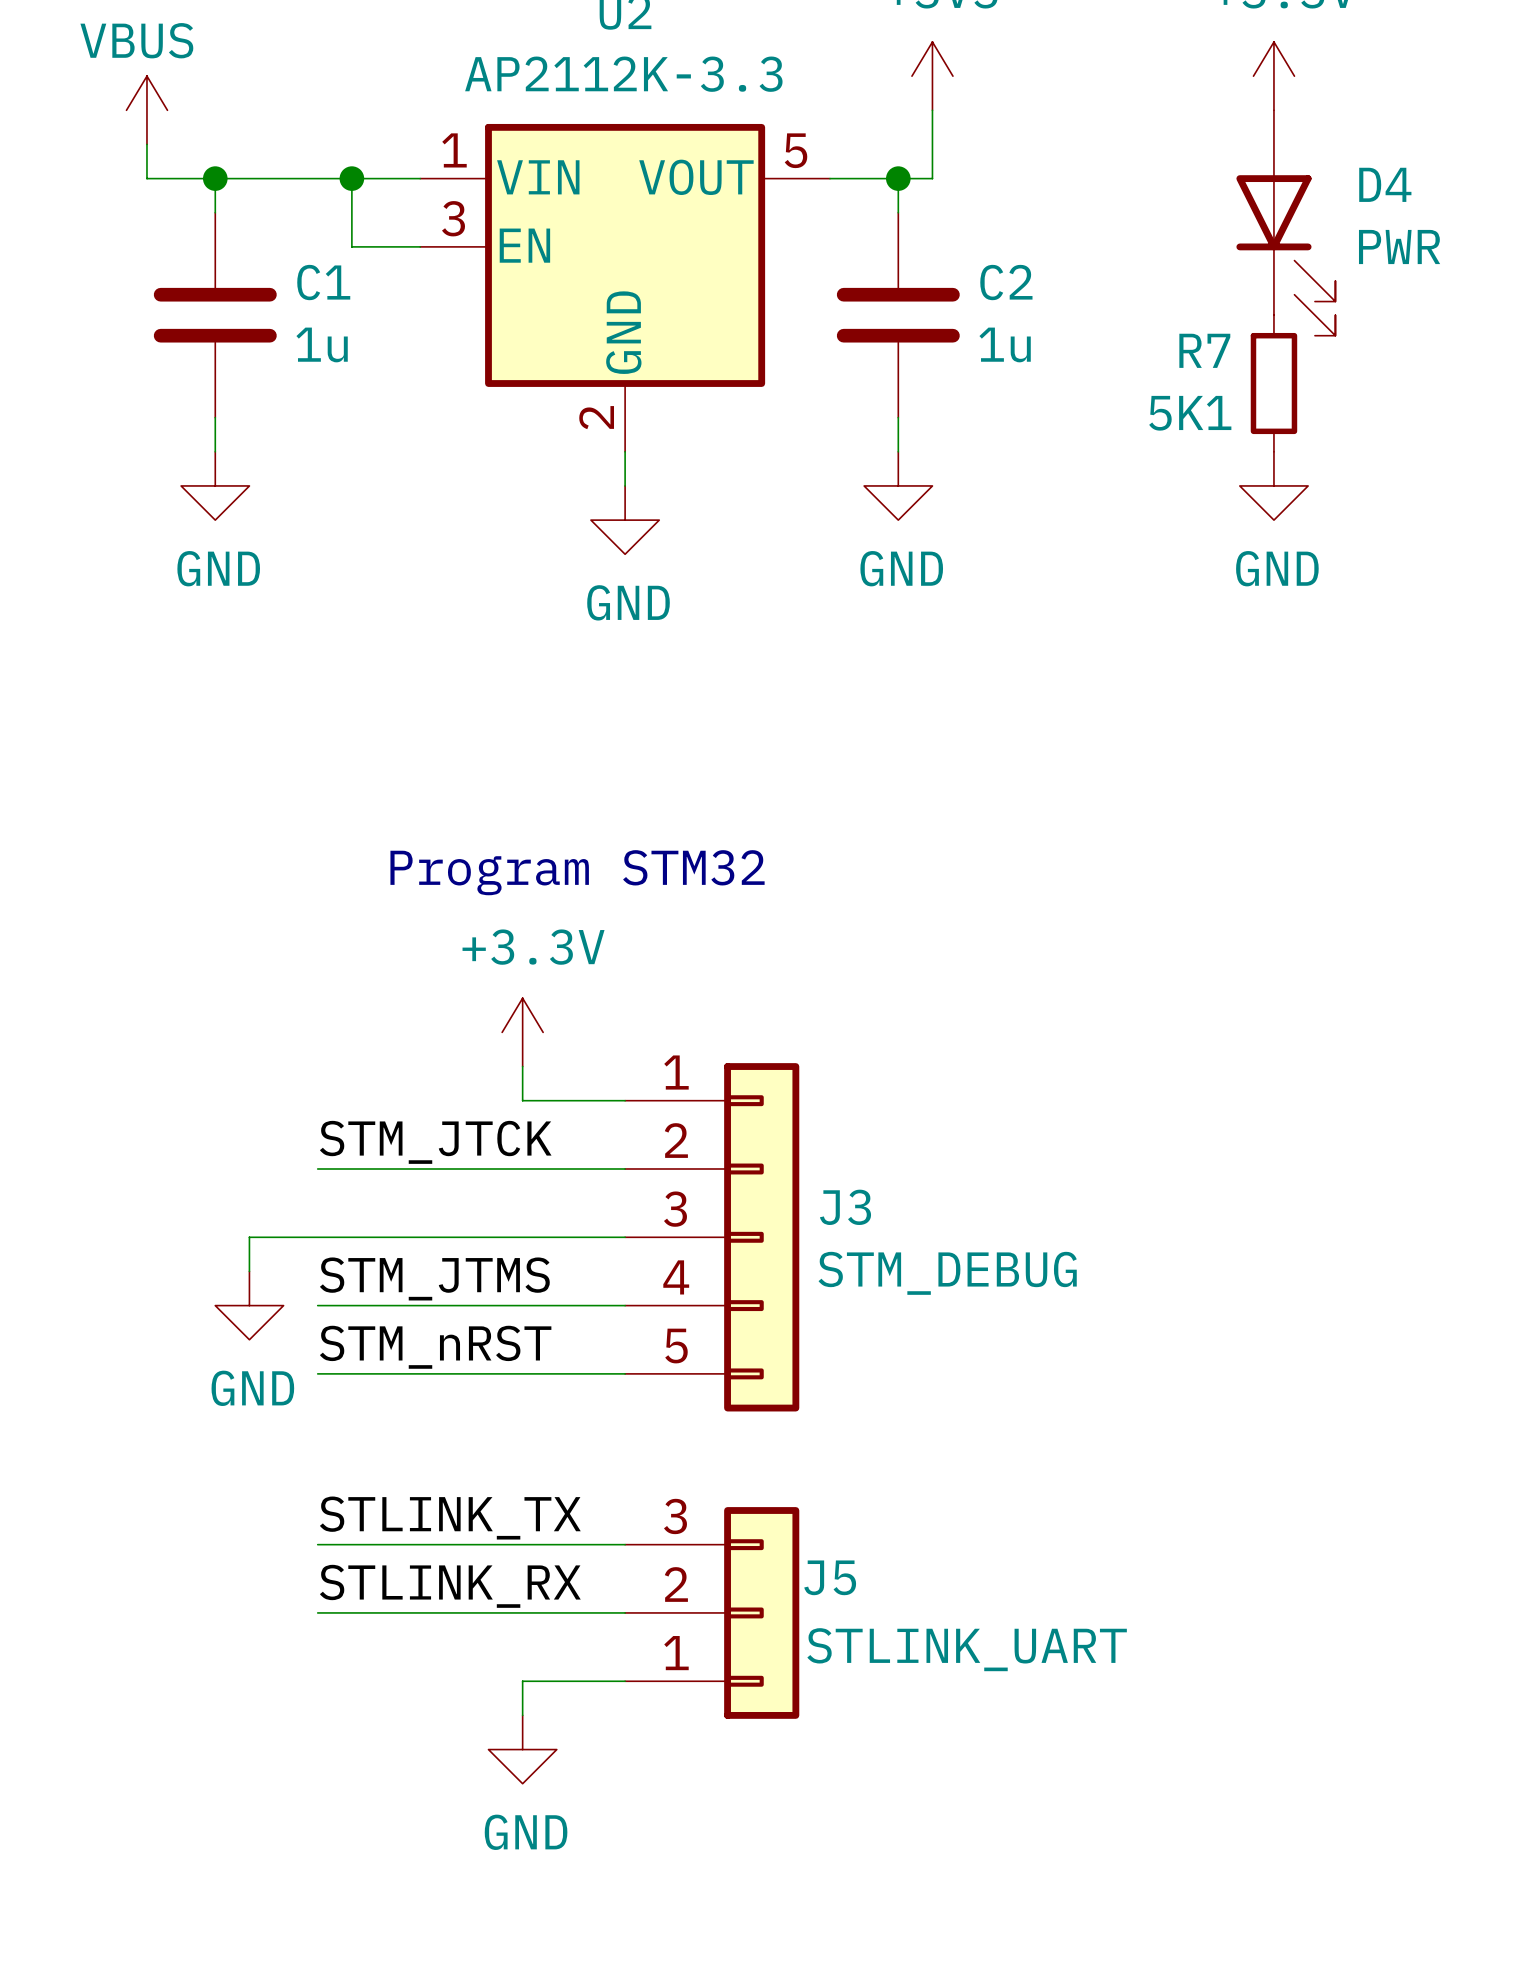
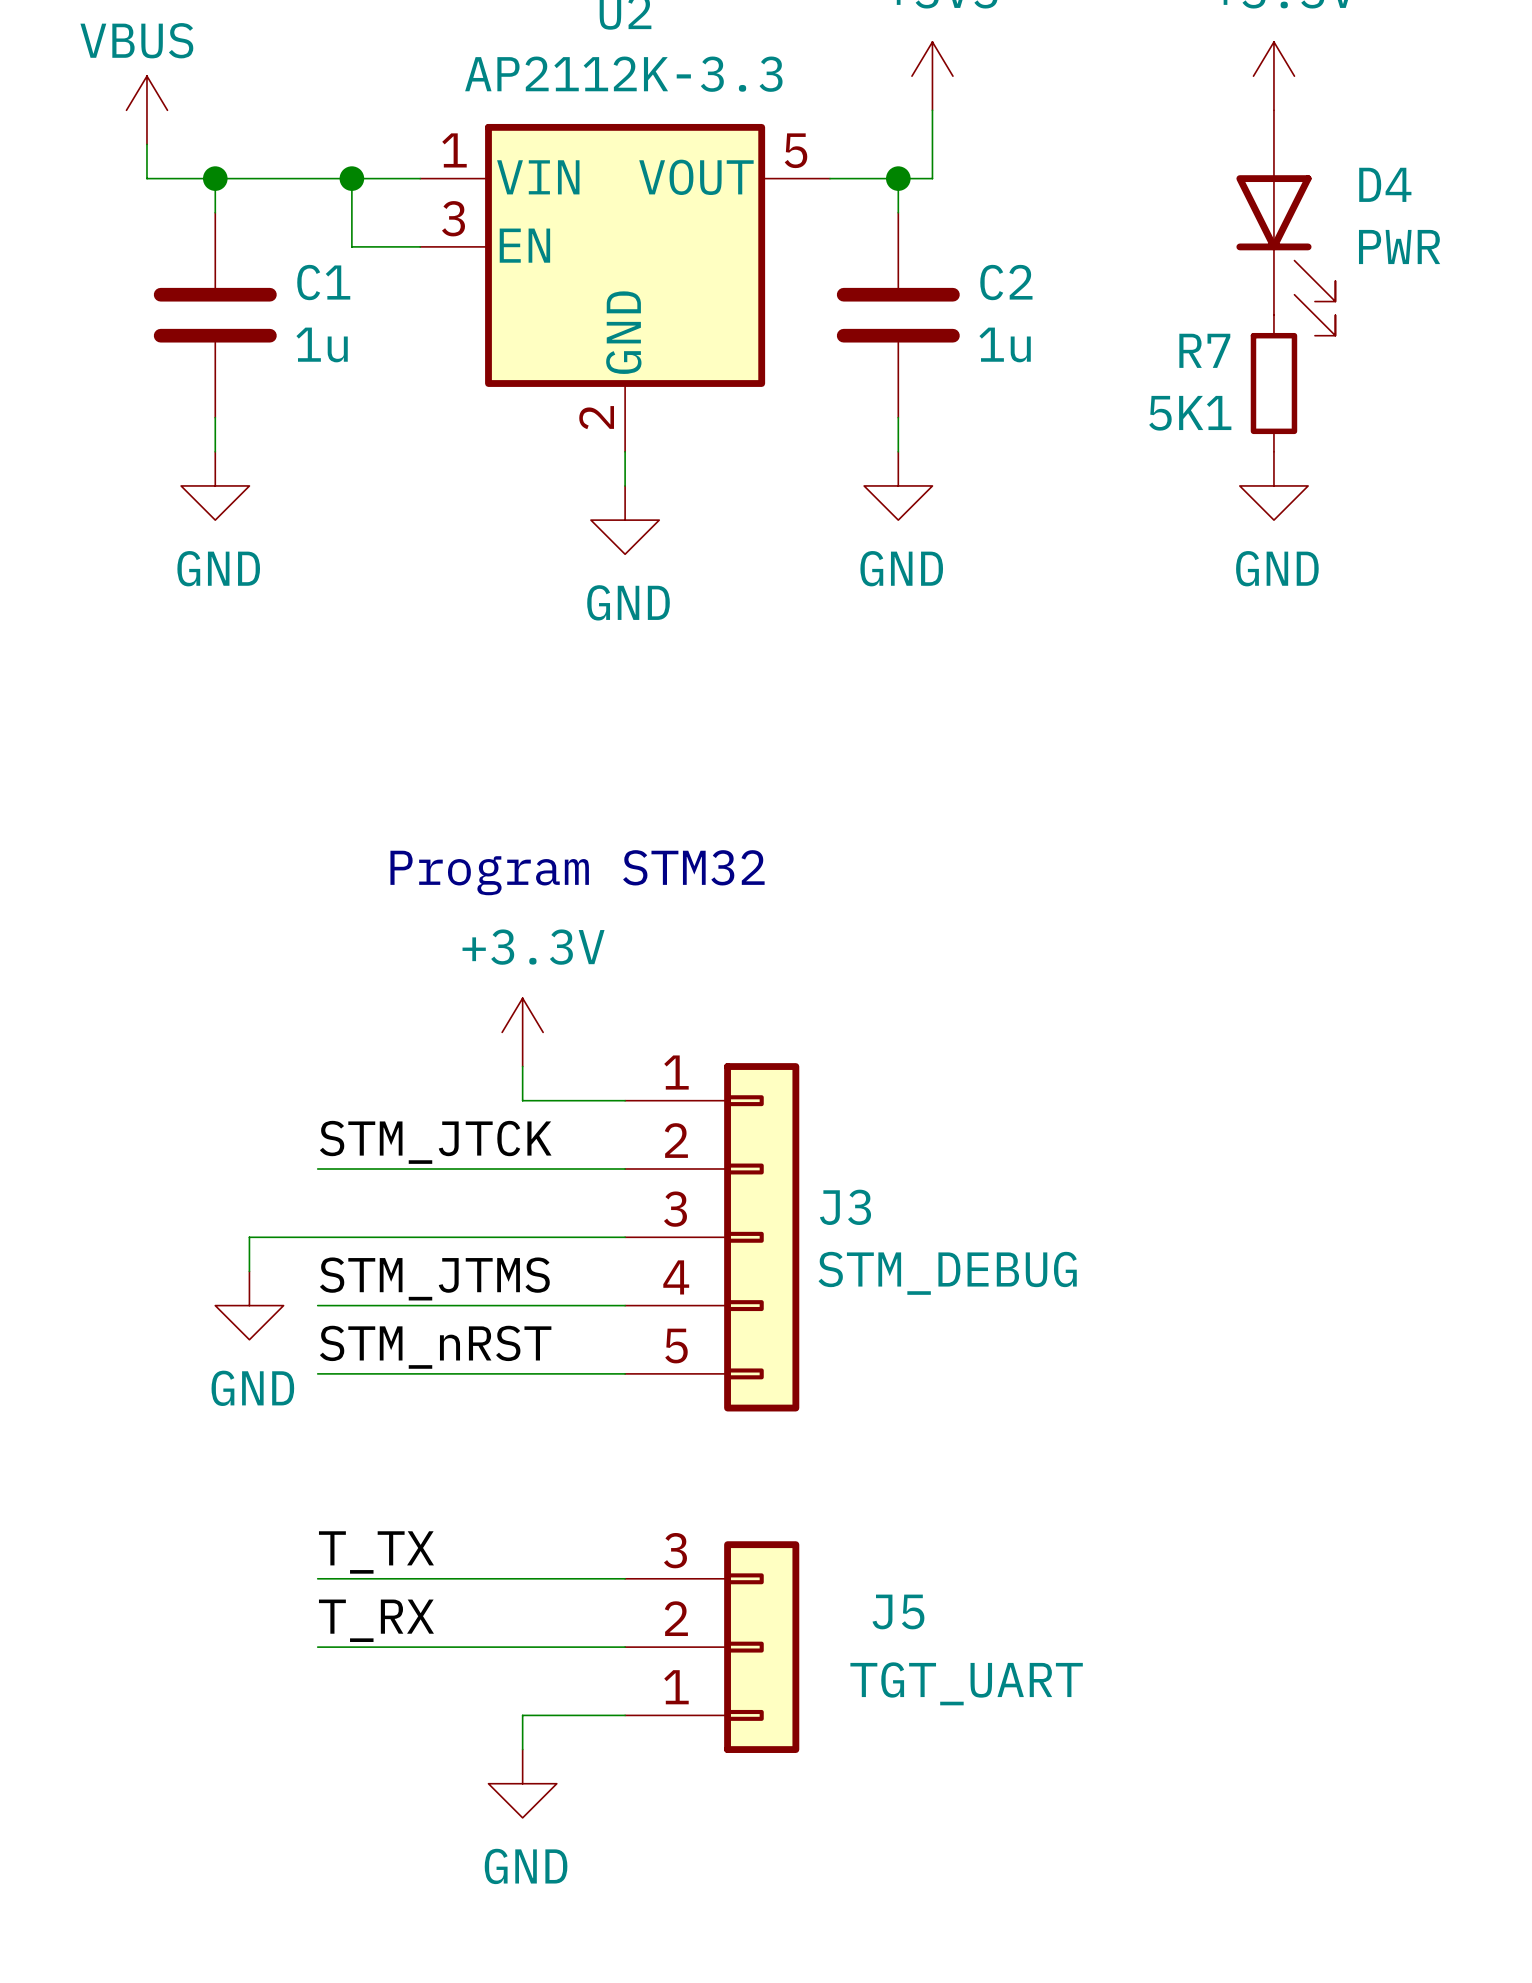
label: STLINK_TX (450, 1518) -> T_TX (376, 1552)
wire: (317, 1544) (625, 1544) -> (317, 1578) (625, 1578)
J5 name position: J5 (830, 1577) -> J5 (898, 1611)
label: STLINK_RX (450, 1586) -> T_RX (376, 1620)
wire: (317, 1612) (625, 1612) -> (317, 1647) (625, 1647)
J5 position: (712, 1612) -> (712, 1647)
J5 value: STLINK_UART (967, 1649) -> TGT_UART (966, 1683)
wire: (625, 1681) (522, 1681) (522, 1715) -> (625, 1715) (522, 1715) (522, 1749)
power symbol position: GND (522, 1749) -> GND (522, 1783)

